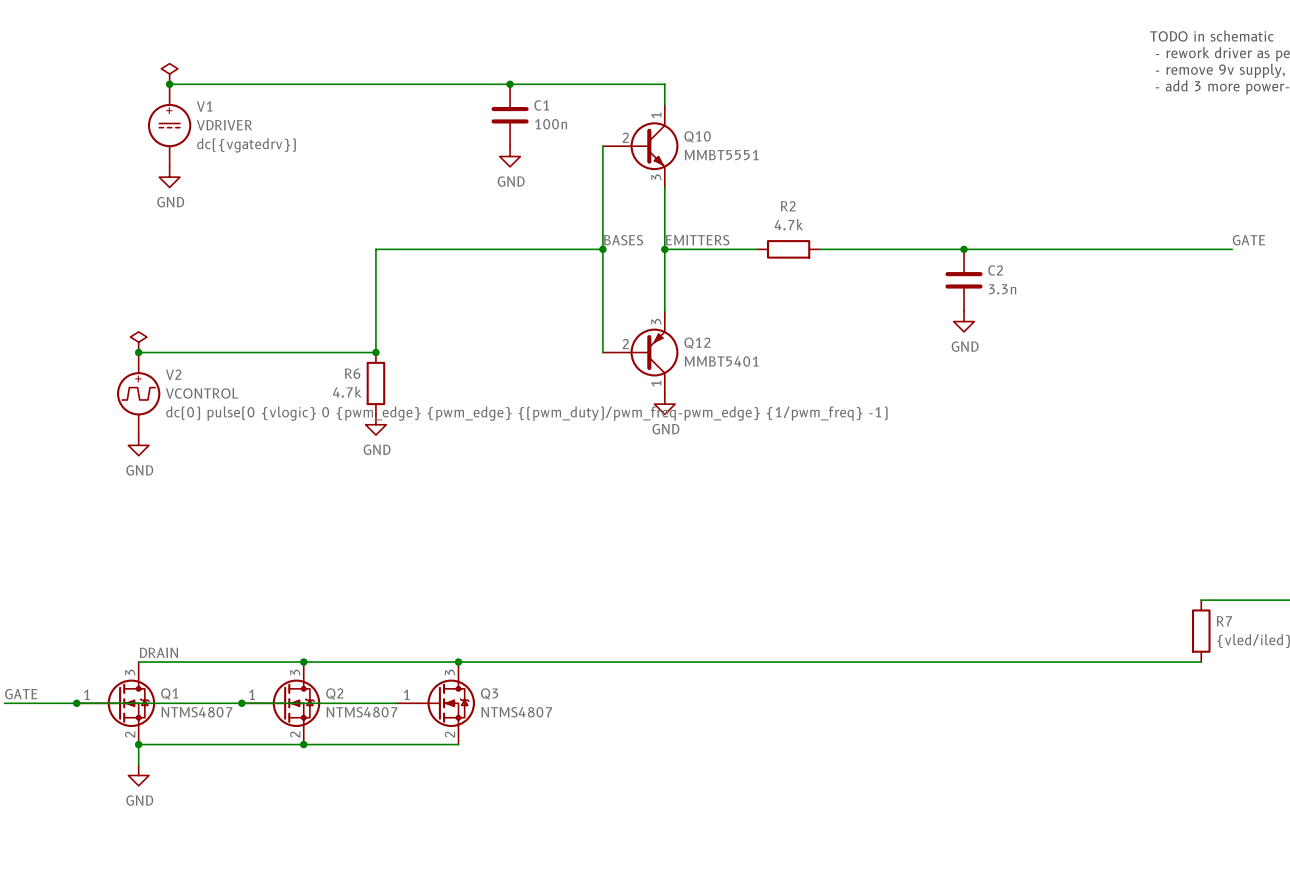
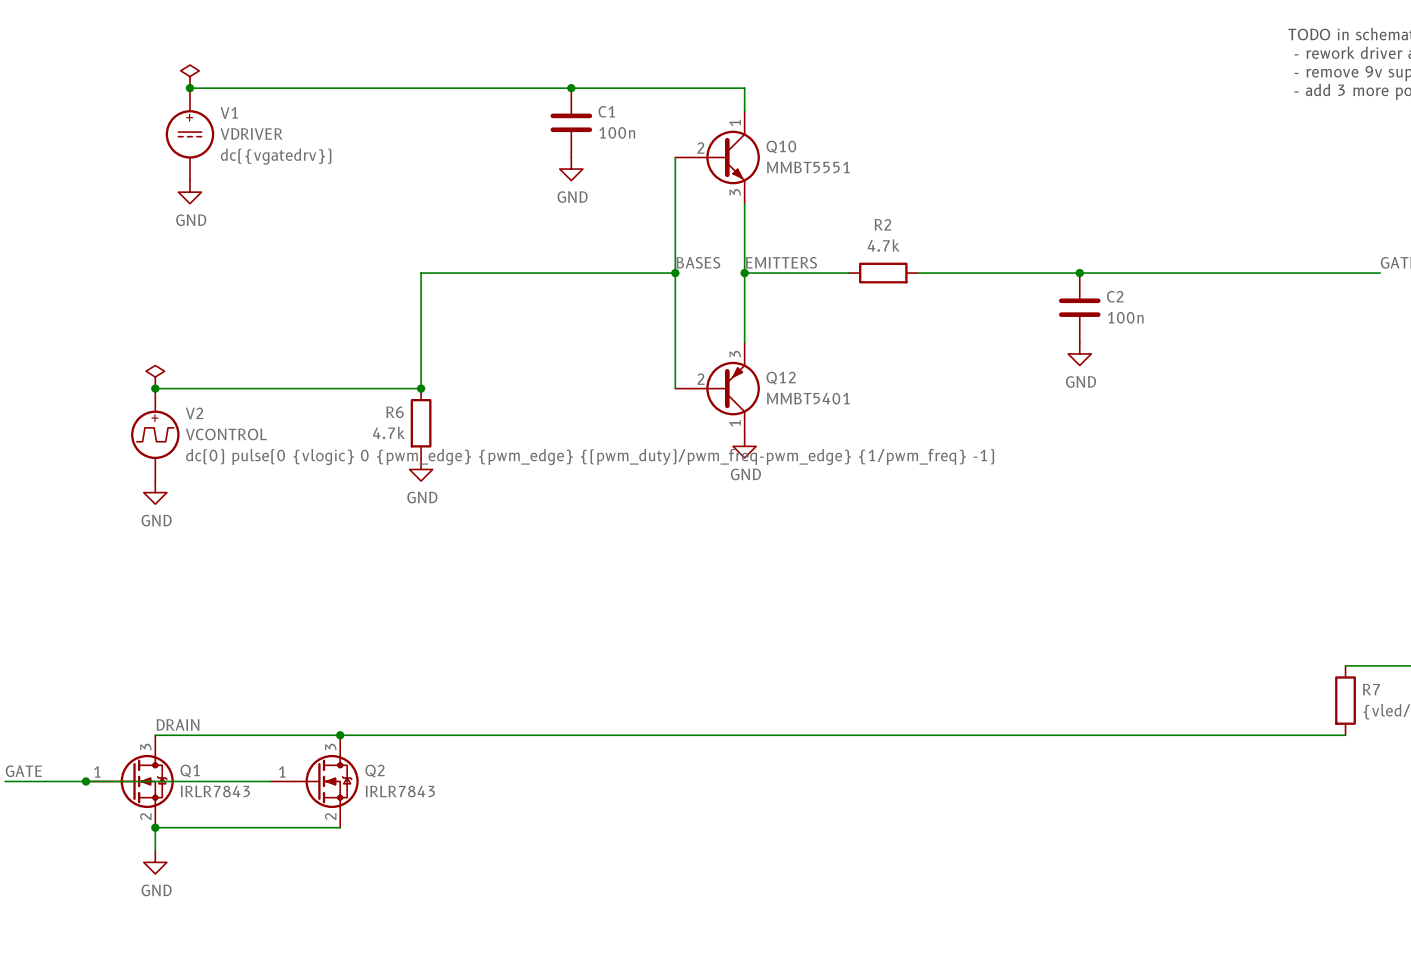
C2 value: 3.3n (1002, 289) -> 100n (1125, 317)
junction: (458, 662) -> none
wire: (241, 703) (396, 703) -> none
junction: (241, 703) -> none
Q3: NTMS4807 (435, 703) -> none
Q1 value: NTMS4807 (196, 712) -> IRLR7843 (215, 791)
Q2 value: NTMS4807 (361, 712) -> IRLR7843 (400, 791)
wire: (303, 744) (458, 744) -> none
junction: (303, 744) -> none

